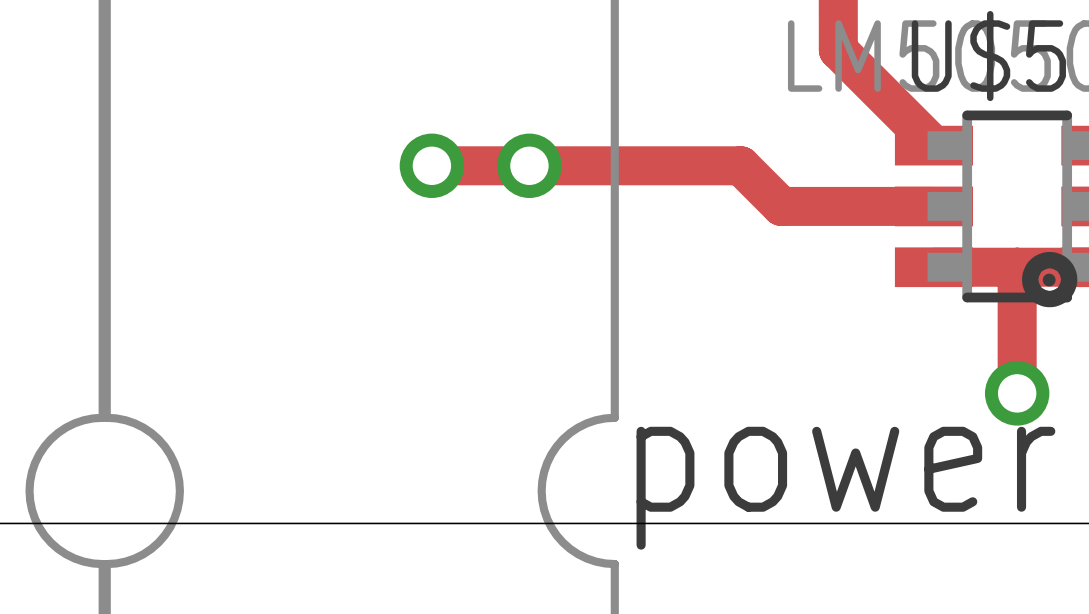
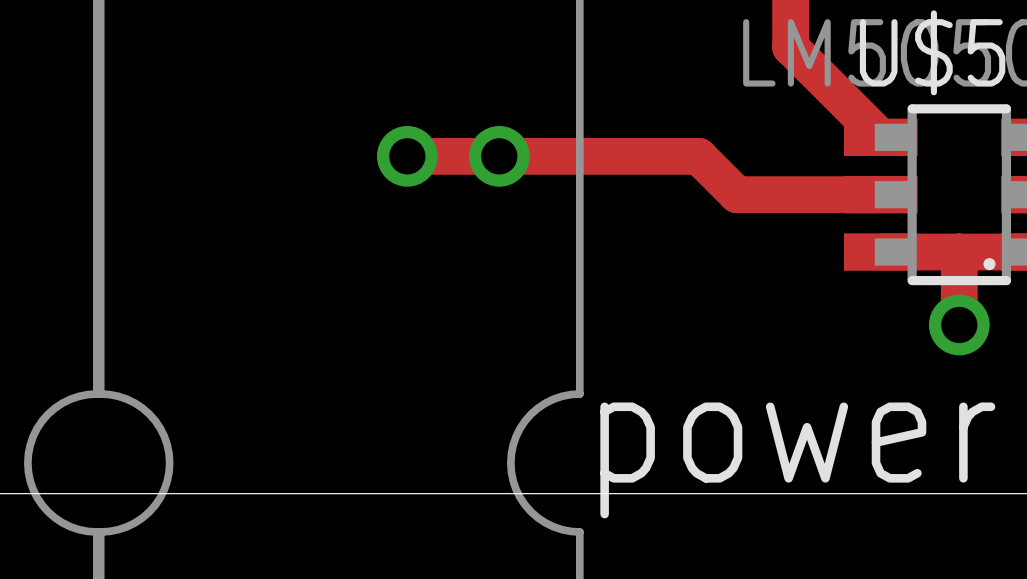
drawing: [1022, 251, 1078, 308] -> none
via position: (1017, 393) -> (959, 325)

